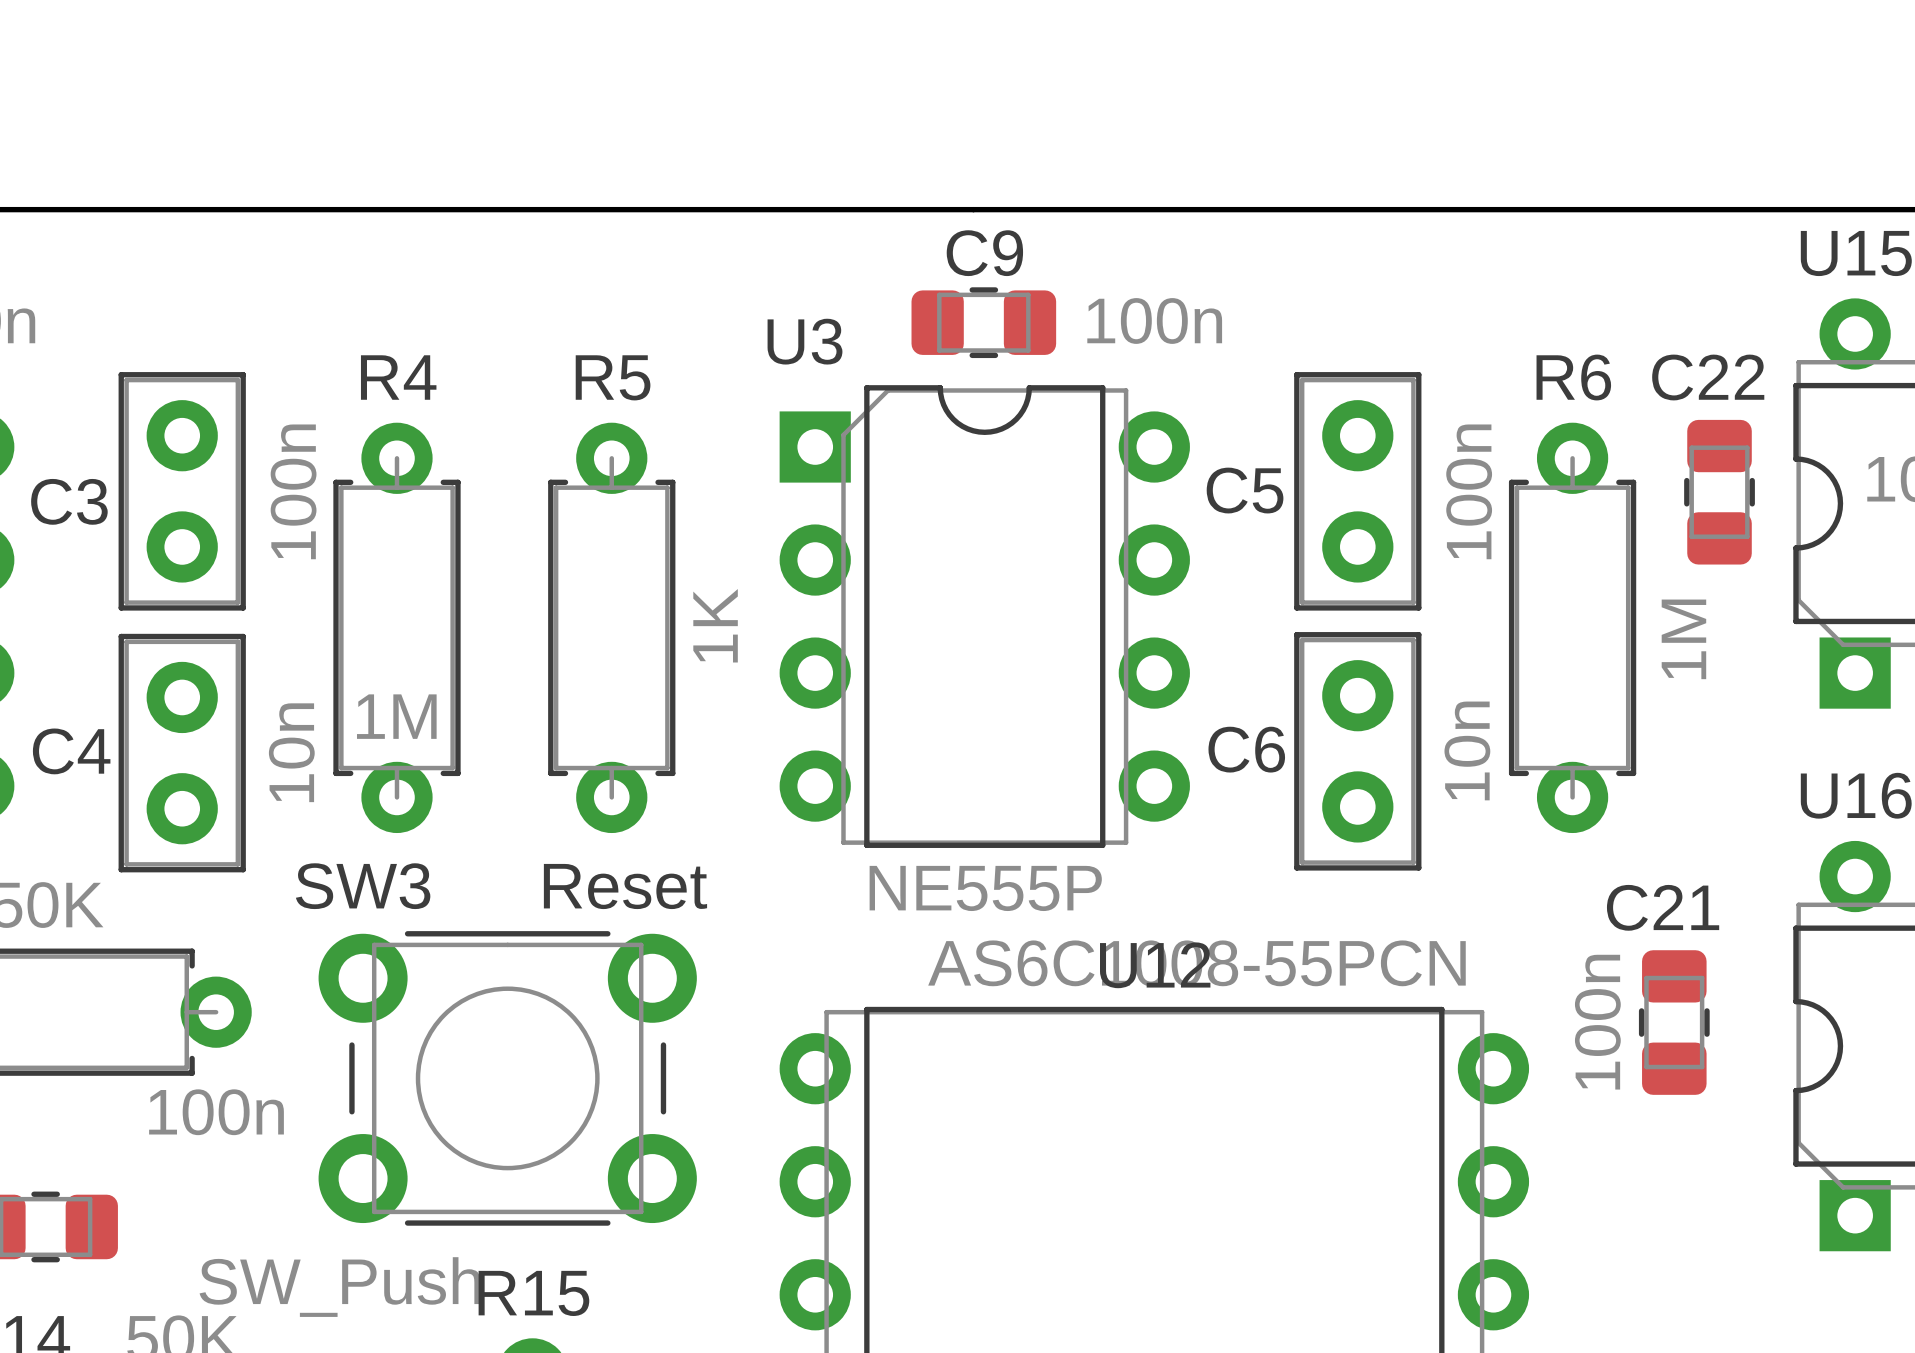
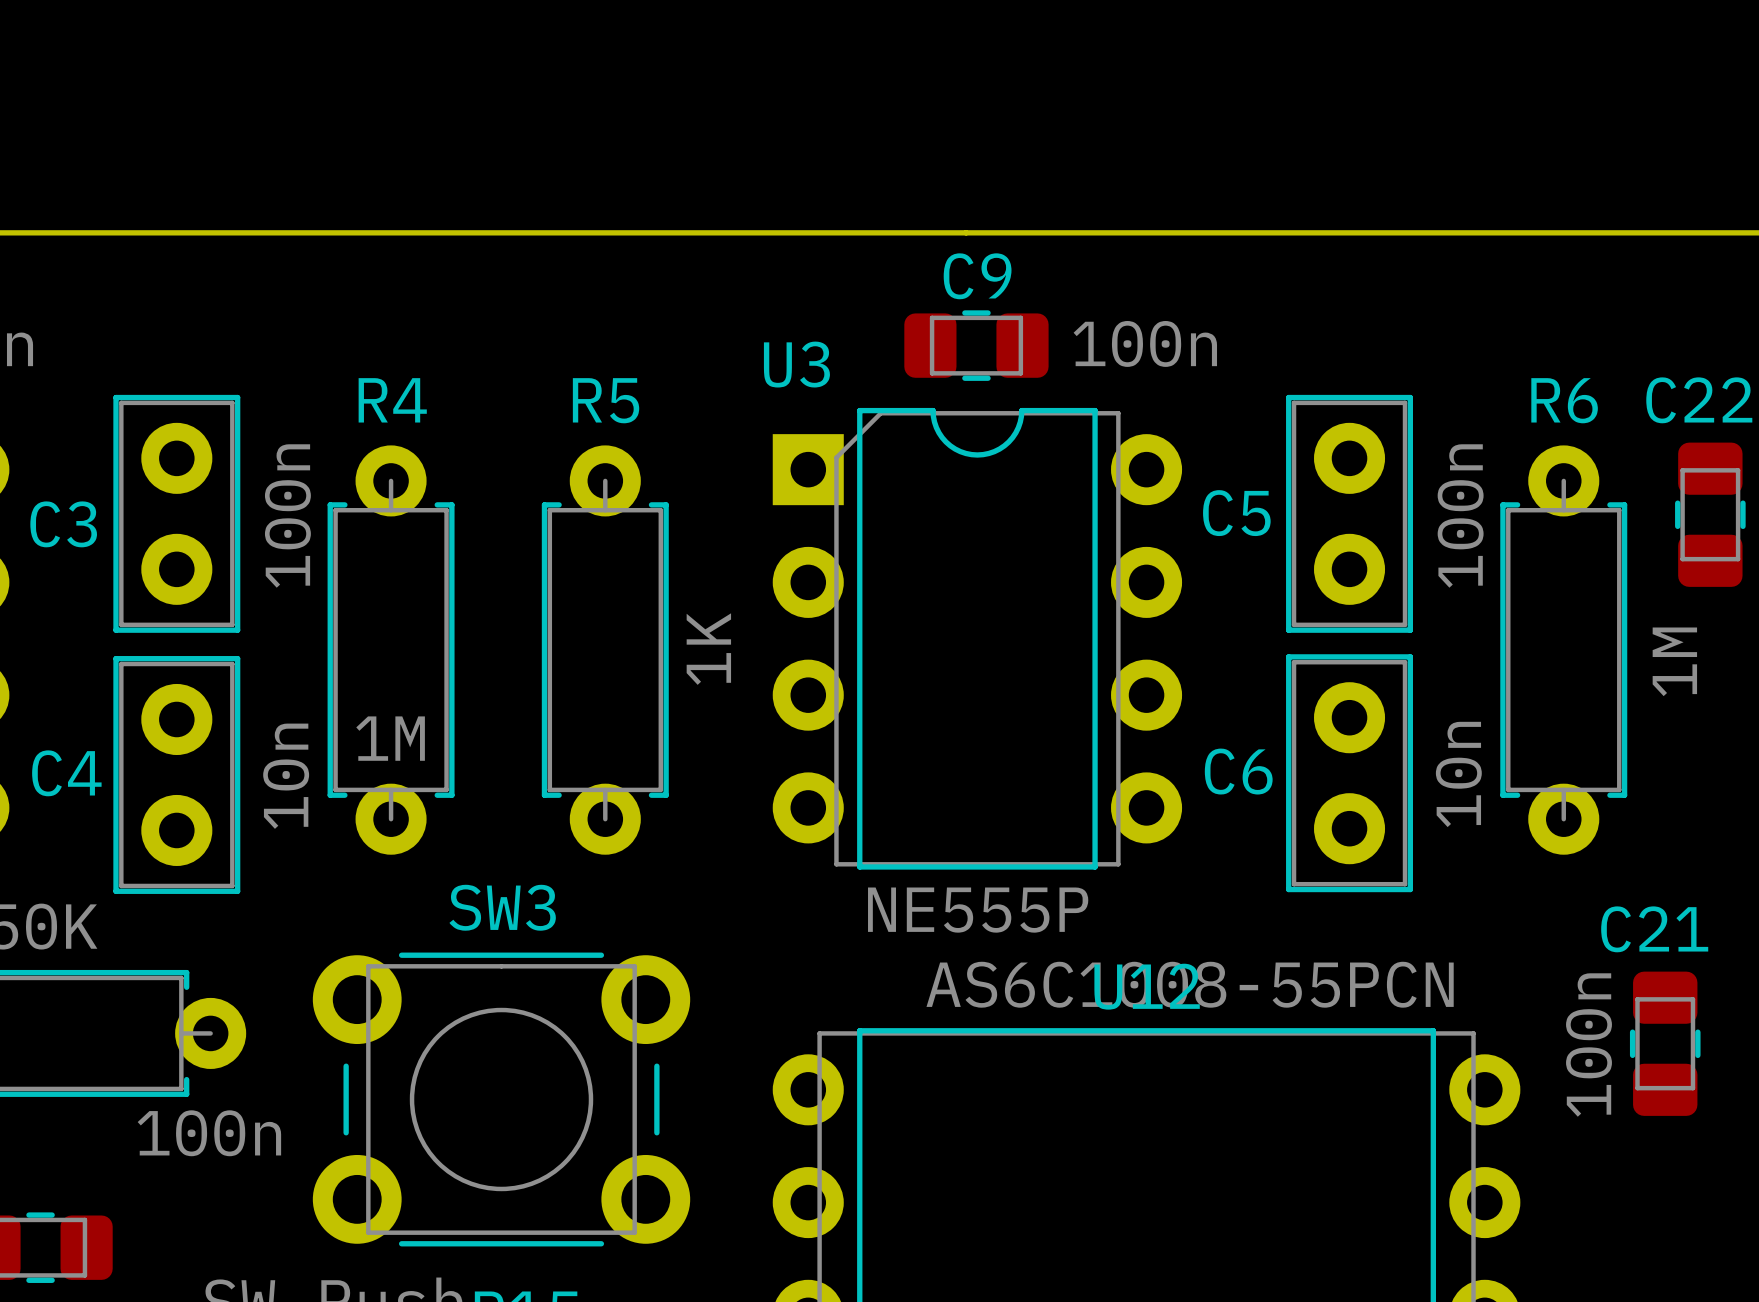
SW3 name position: SW3 (363, 886) -> SW3 (502, 907)
text: Reset (625, 886) -> none

